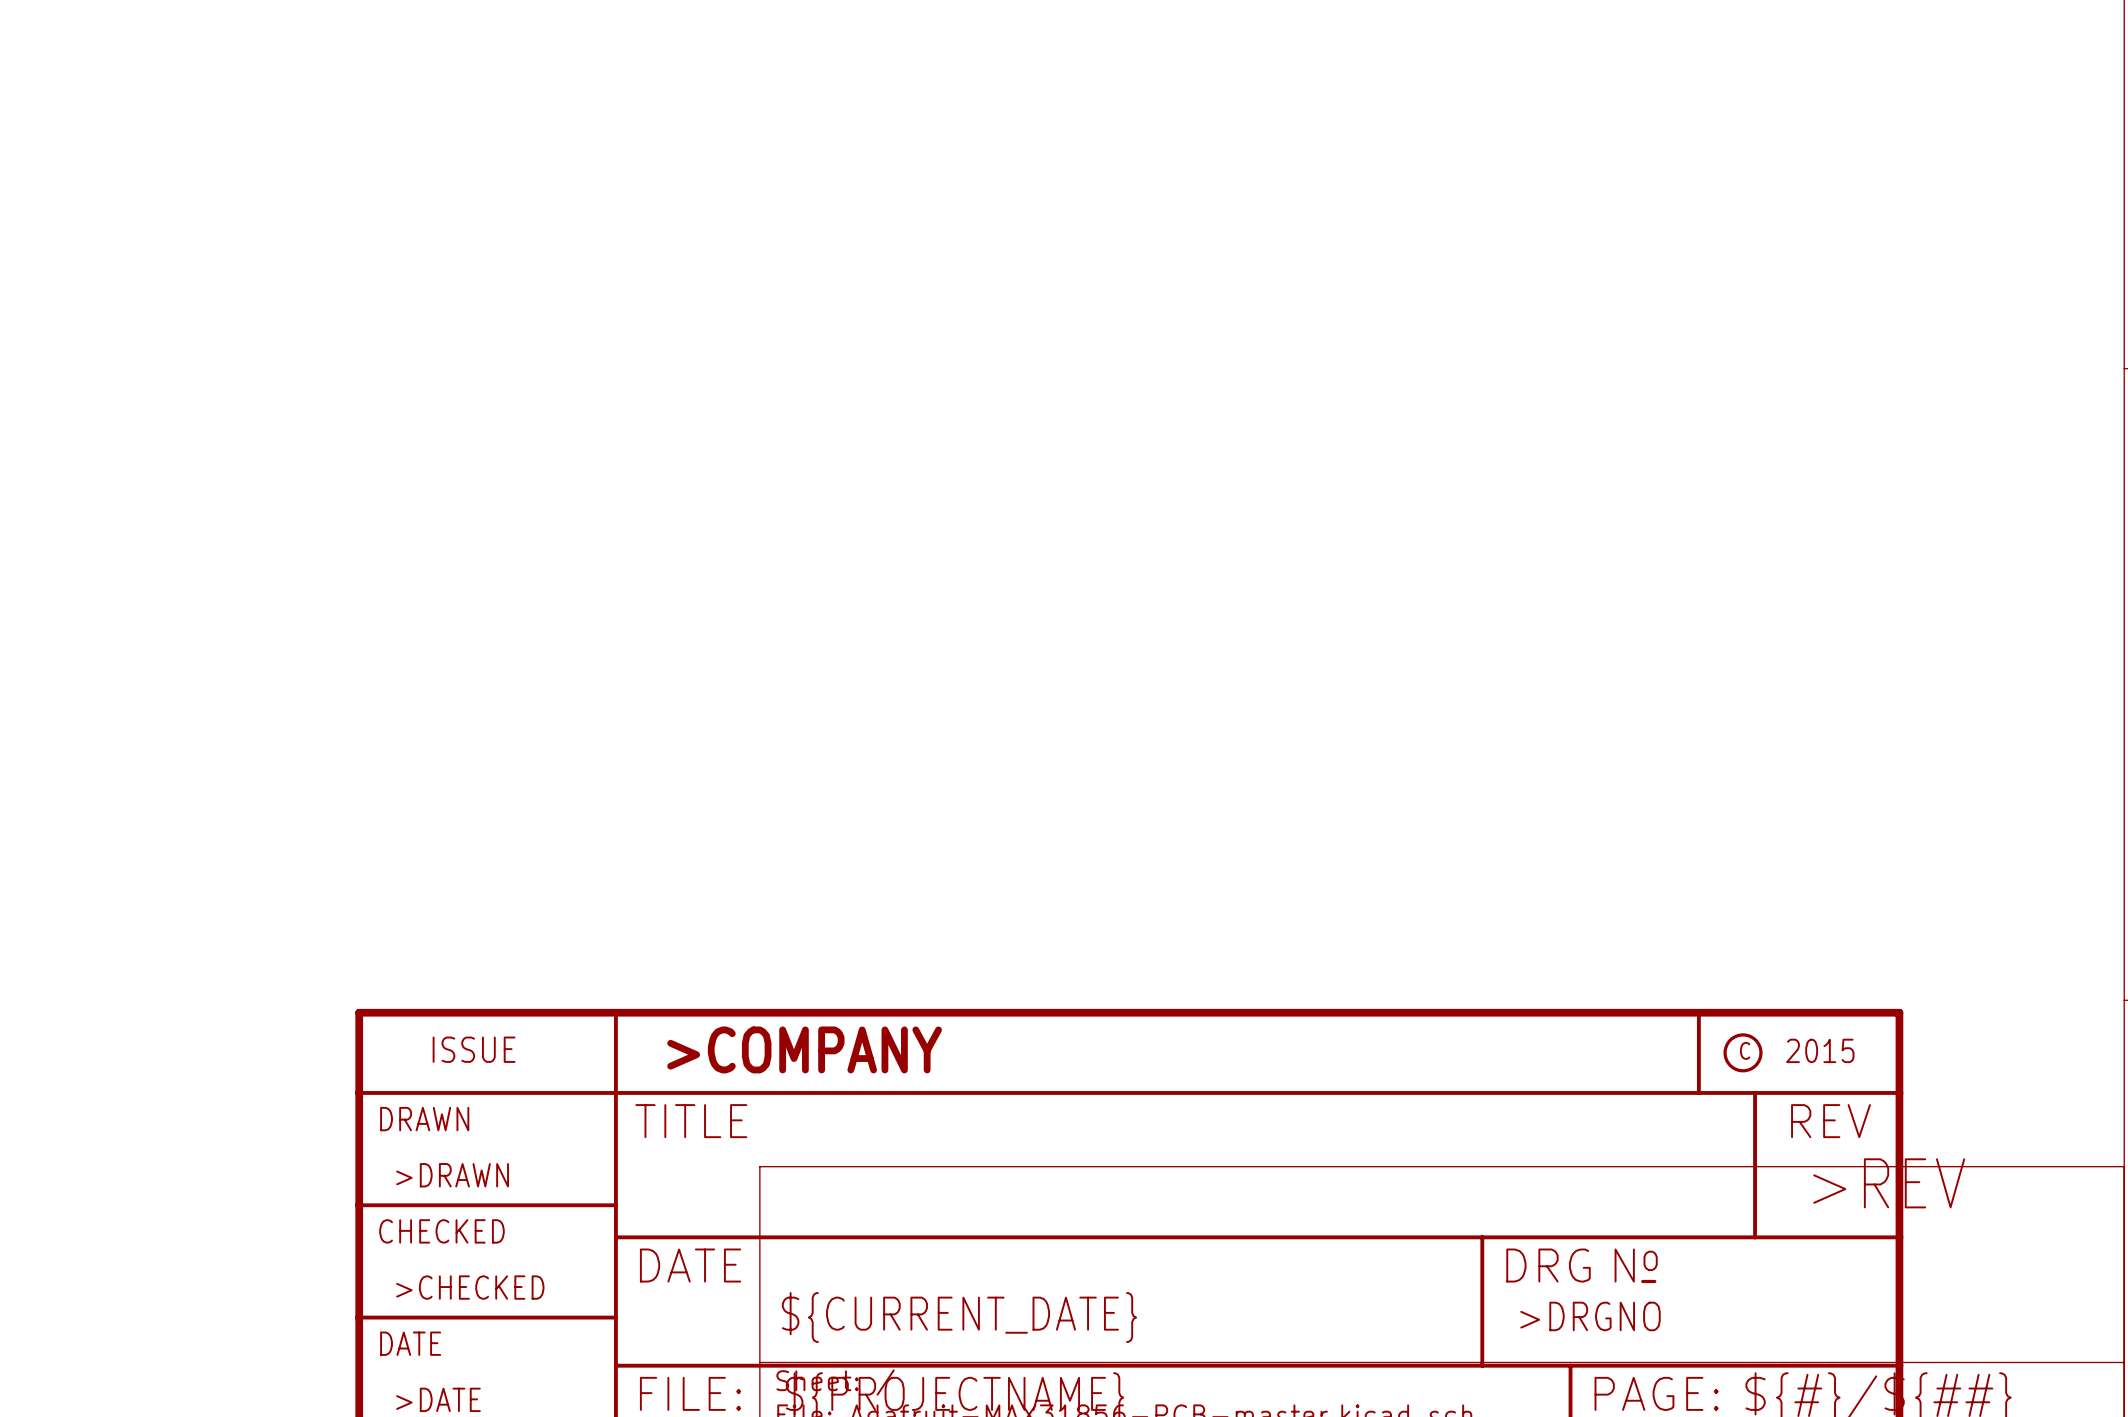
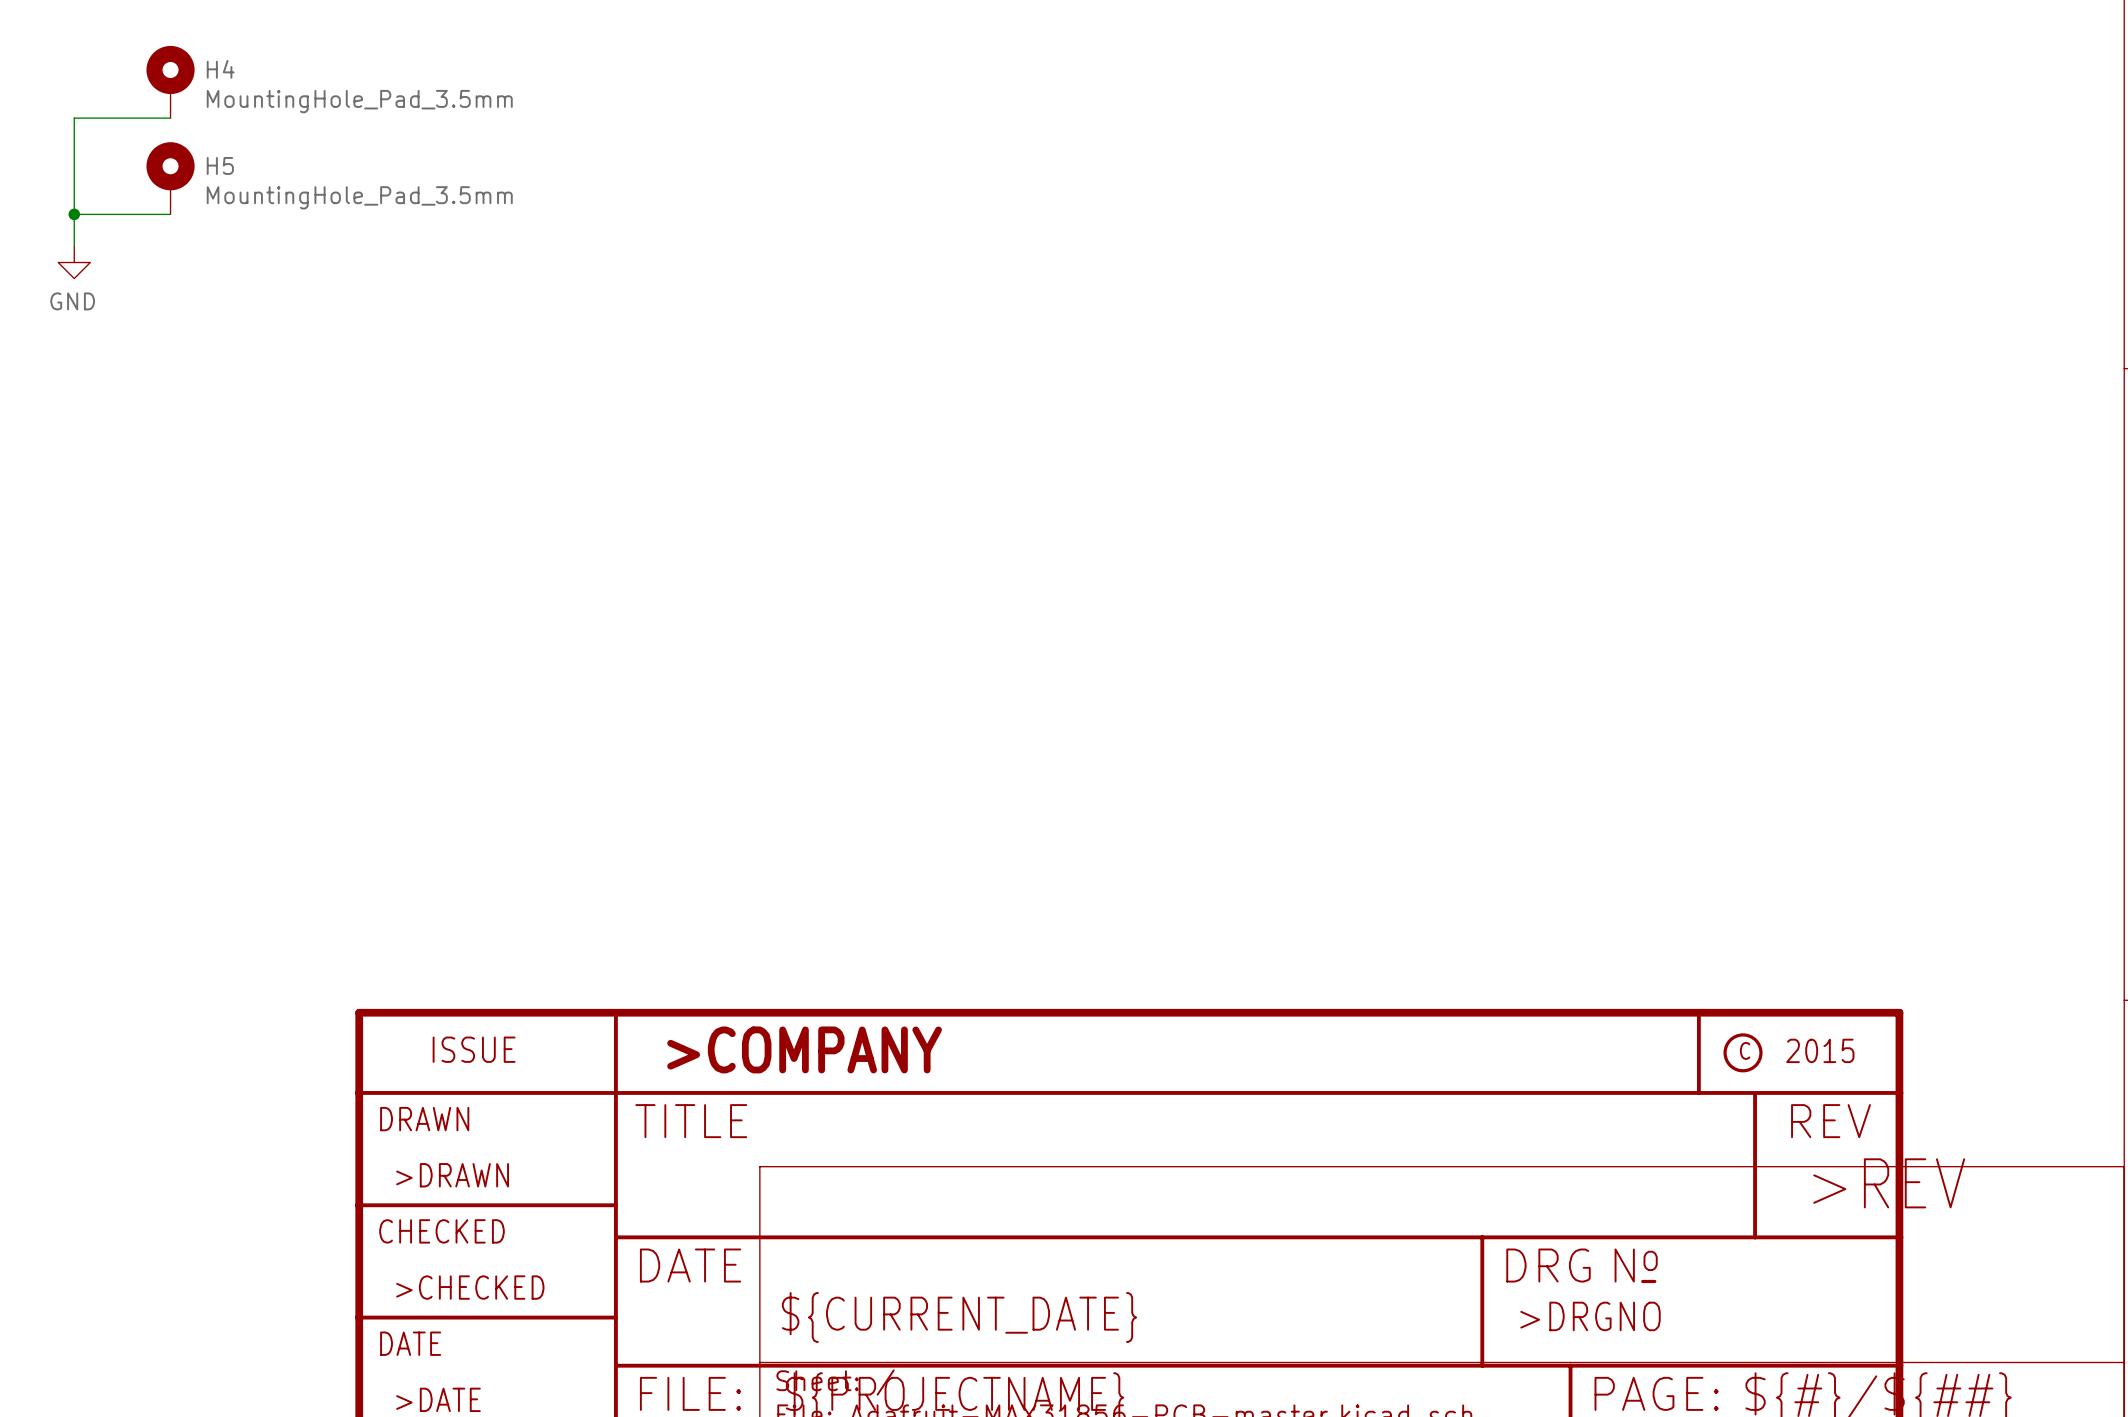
H4: none -> MountingHole_Pad_3.5mm (170, 82)
wire: none -> (170, 118) (74, 118) (74, 246)
H5: none -> MountingHole_Pad_3.5mm (170, 178)
wire: none -> (74, 214) (170, 214)
junction: none -> (74, 214)
power symbol: none -> GND (74, 262)

